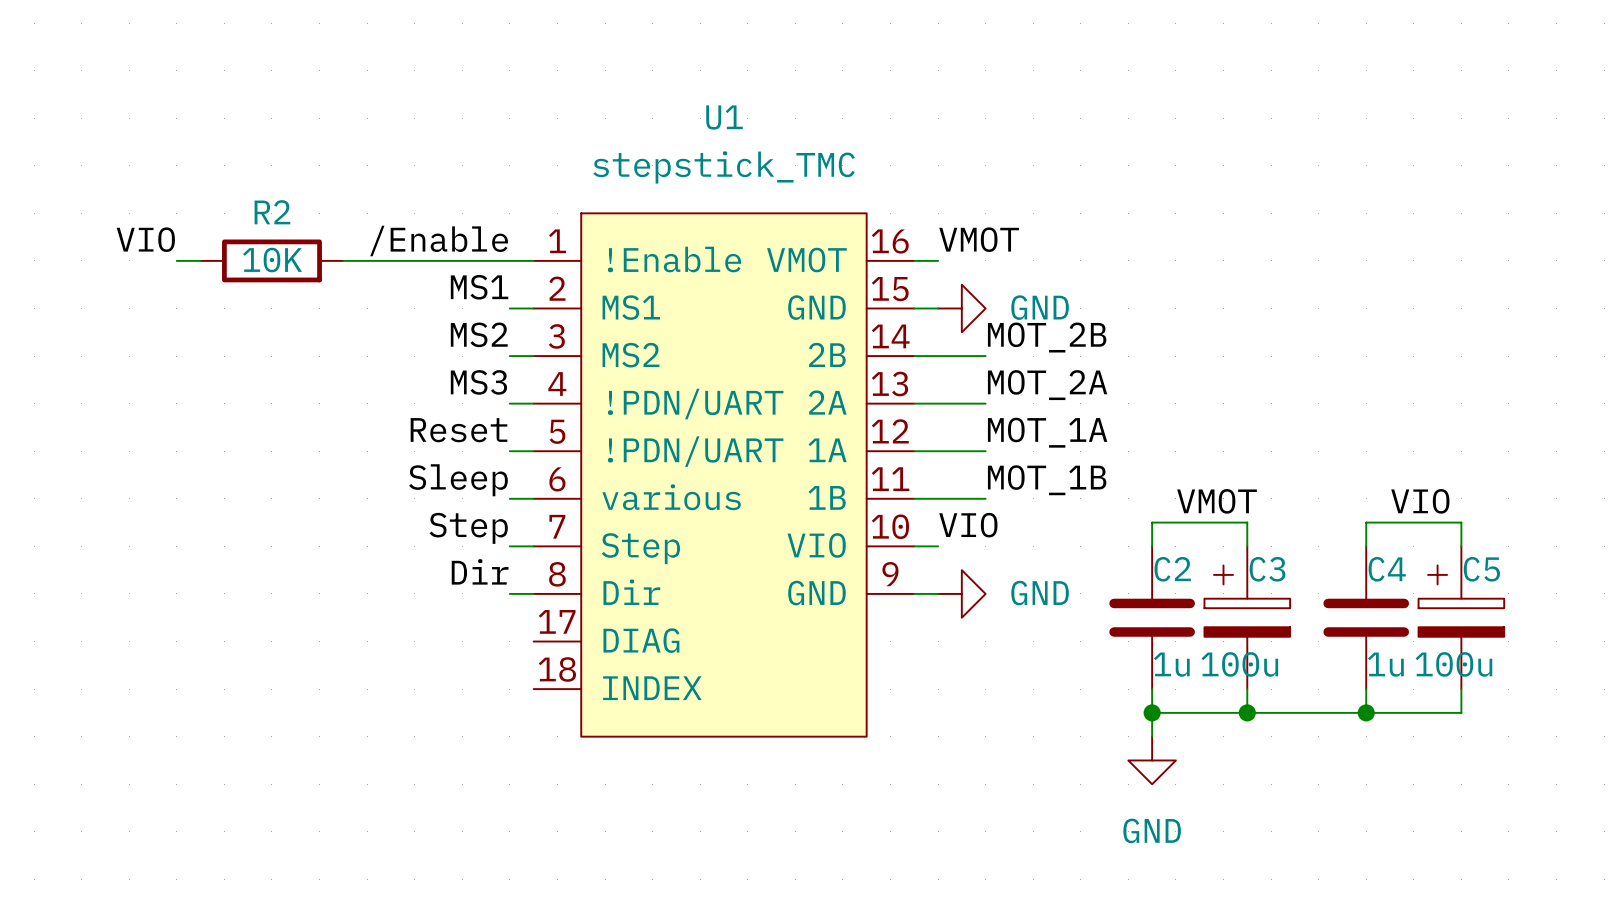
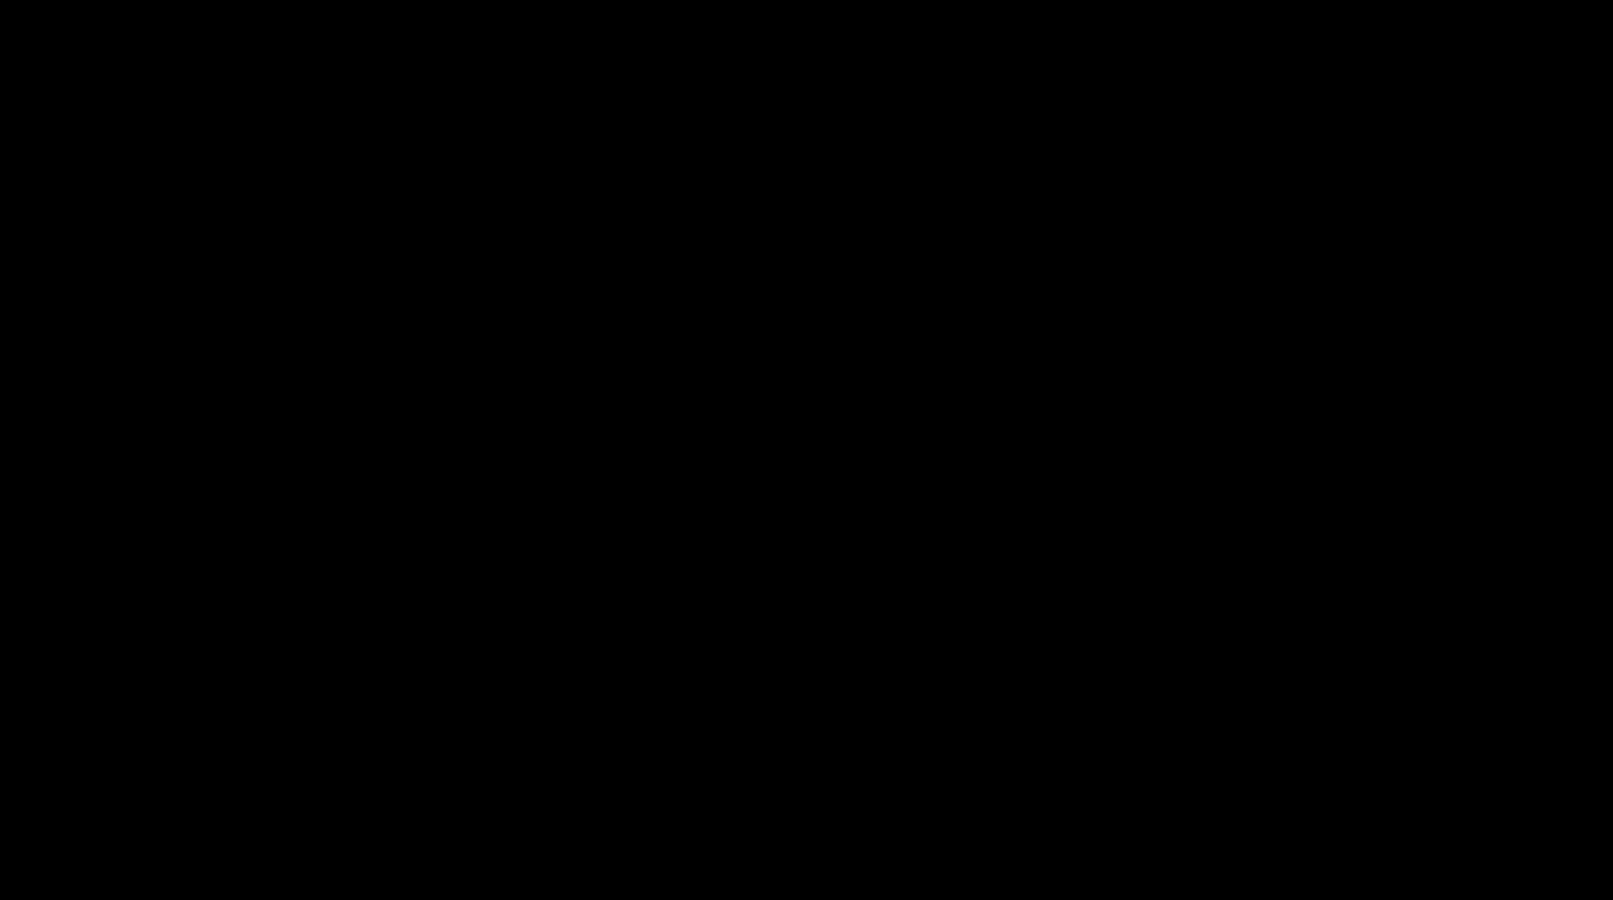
label: VIO (145, 239) -> none
label: VMOT (979, 239) -> none
label: /Enable (439, 240) -> none
wire: (176, 260) (200, 260) -> none
R2: 10K (271, 260) -> none
wire: (343, 260) (533, 260) -> none
wire: (914, 260) (938, 260) -> none
label: MS1 (479, 287) -> none
wire: (509, 308) (533, 308) -> none
wire: (914, 308) (938, 308) -> none
power symbol: GND (961, 308) -> none
label: MS2 (479, 334) -> none
label: MOT_2B (1047, 337) -> none
wire: (509, 356) (533, 356) -> none
wire: (914, 356) (985, 356) -> none
label: MS3 (478, 382) -> none
label: MOT_2A (1047, 385) -> none
wire: (509, 403) (533, 403) -> none
wire: (914, 403) (985, 403) -> none
label: Reset (459, 430) -> none
label: MOT_1A (1047, 432) -> none
wire: (509, 451) (533, 451) -> none
wire: (914, 451) (985, 451) -> none
U1: stepstick_TMC (723, 475) -> none
label: Sleep (458, 480) -> none
label: MOT_1B (1047, 480) -> none
wire: (509, 498) (533, 498) -> none
wire: (914, 498) (985, 498) -> none
label: VMOT (1217, 501) -> none
label: VIO (1420, 501) -> none
label: VIO (968, 525) -> none
label: Step (468, 528) -> none
wire: (509, 546) (533, 546) -> none
wire: (914, 546) (938, 546) -> none
wire: (1152, 546) (1152, 522) (1247, 522) (1247, 546) -> none
wire: (1366, 546) (1366, 522) (1461, 522) (1461, 546) -> none
label: Dir (480, 571) -> none
wire: (509, 593) (533, 593) -> none
wire: (914, 593) (938, 593) -> none
power symbol: GND (961, 593) -> none
C2: 1u (1152, 617) -> none
C3: 100u (1247, 617) -> none
C4: 1u (1366, 617) -> none
C5: 100u (1461, 617) -> none
wire: (1152, 689) (1152, 736) -> none
wire: (1247, 689) (1247, 712) -> none
wire: (1366, 689) (1366, 712) -> none
wire: (1461, 689) (1461, 712) (1152, 712) -> none
junction: (1152, 712) -> none
junction: (1247, 712) -> none
junction: (1366, 712) -> none
power symbol: GND (1152, 760) -> none

